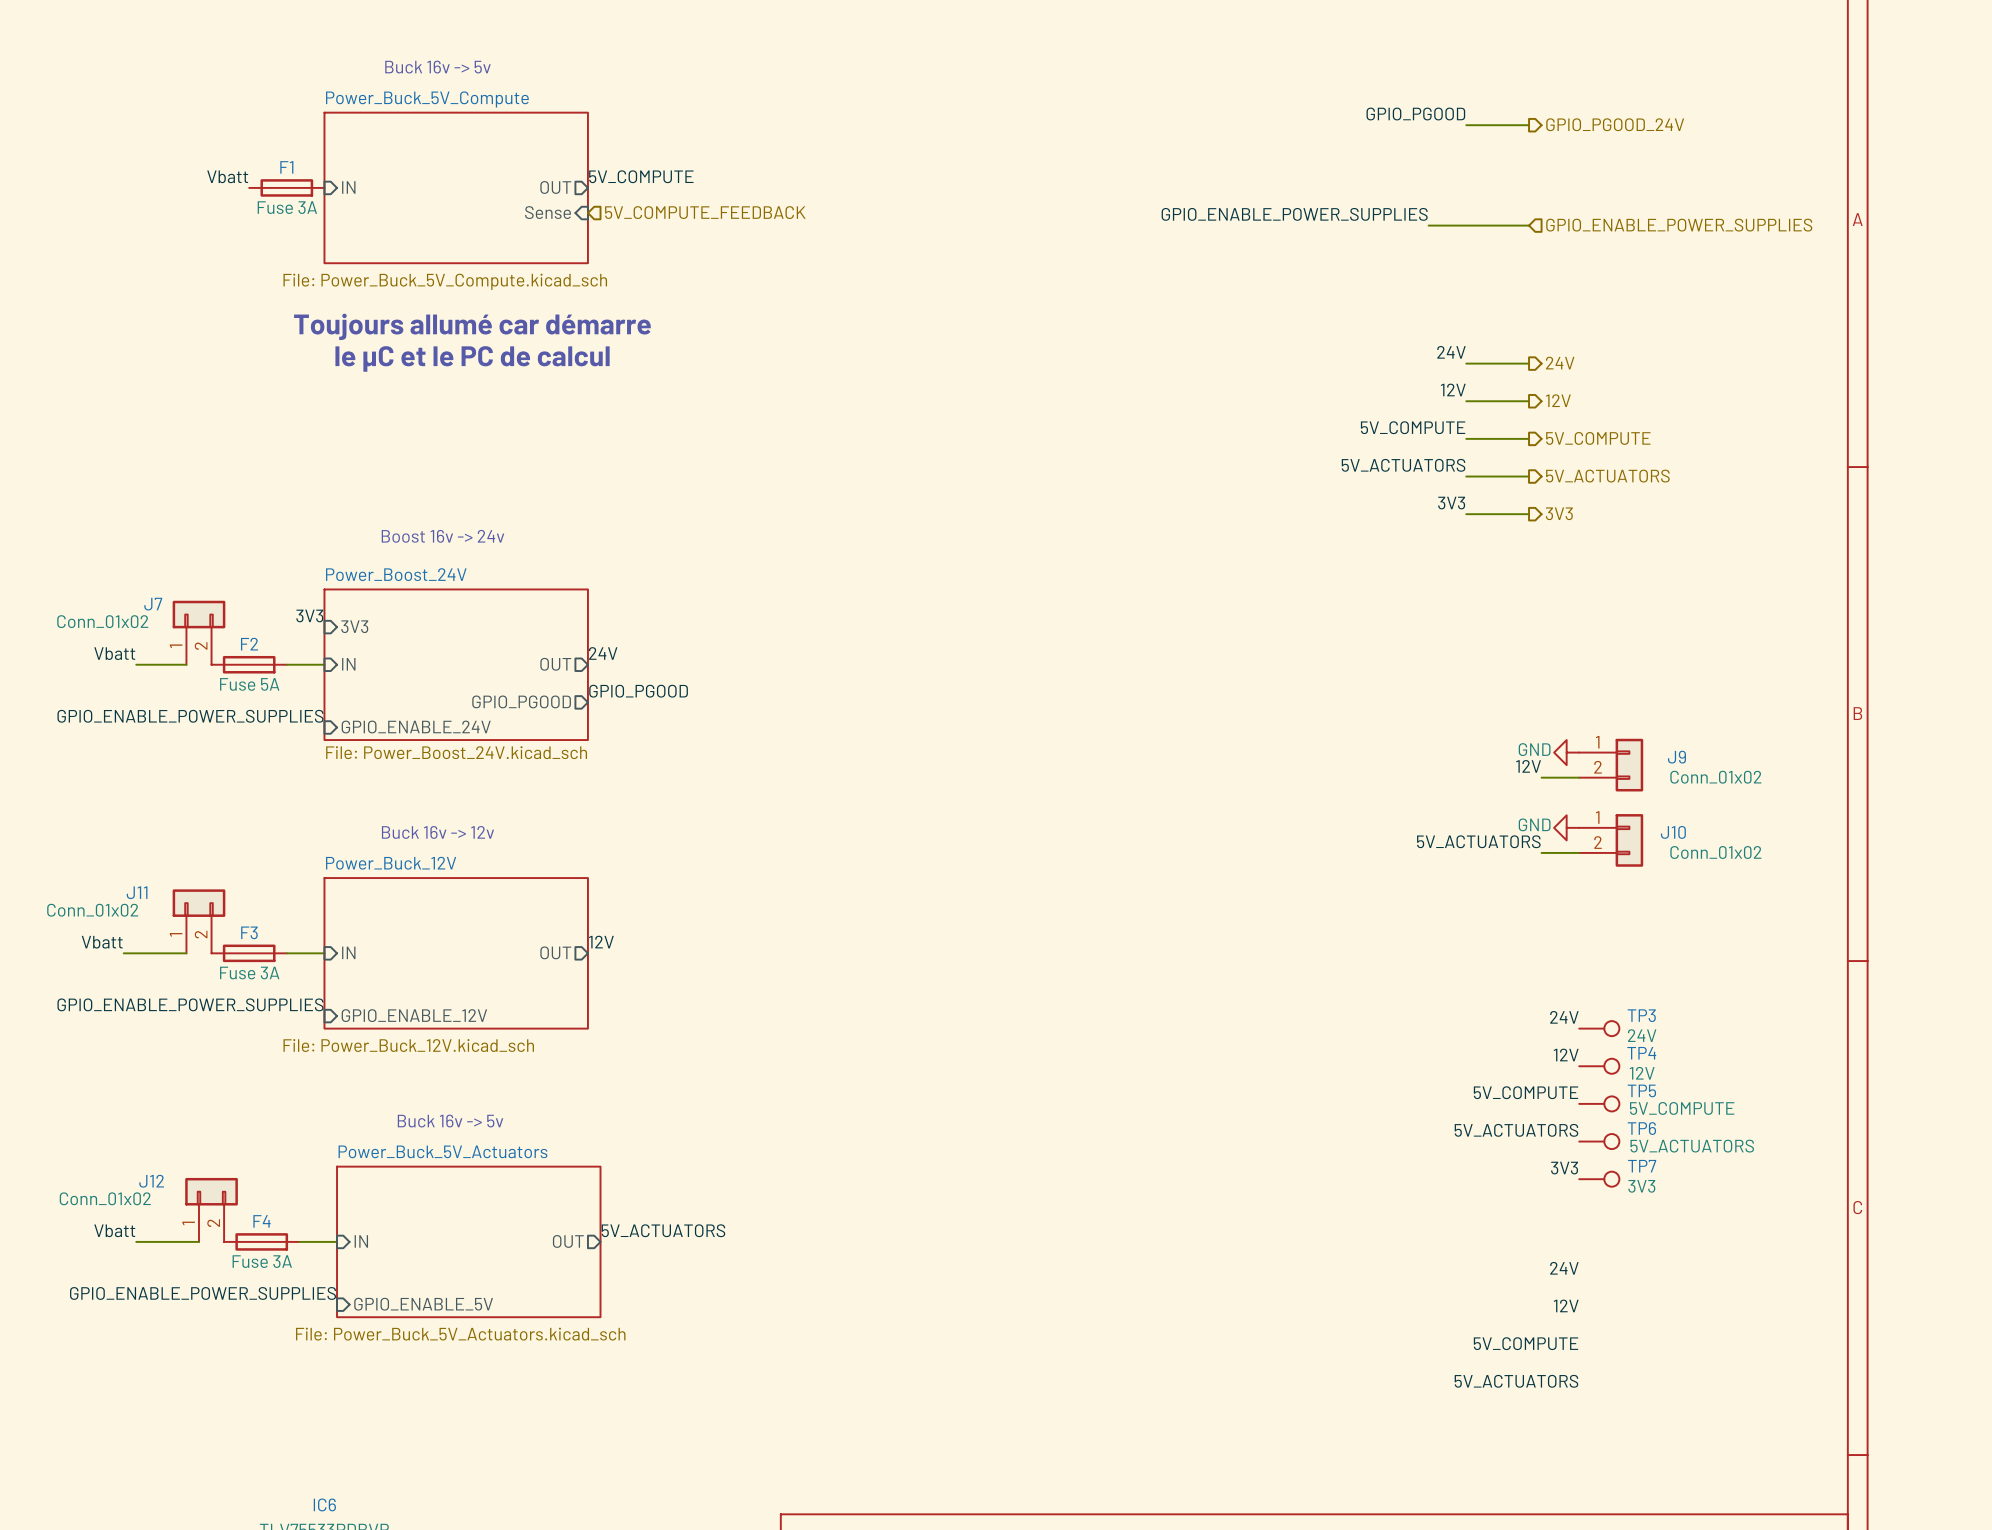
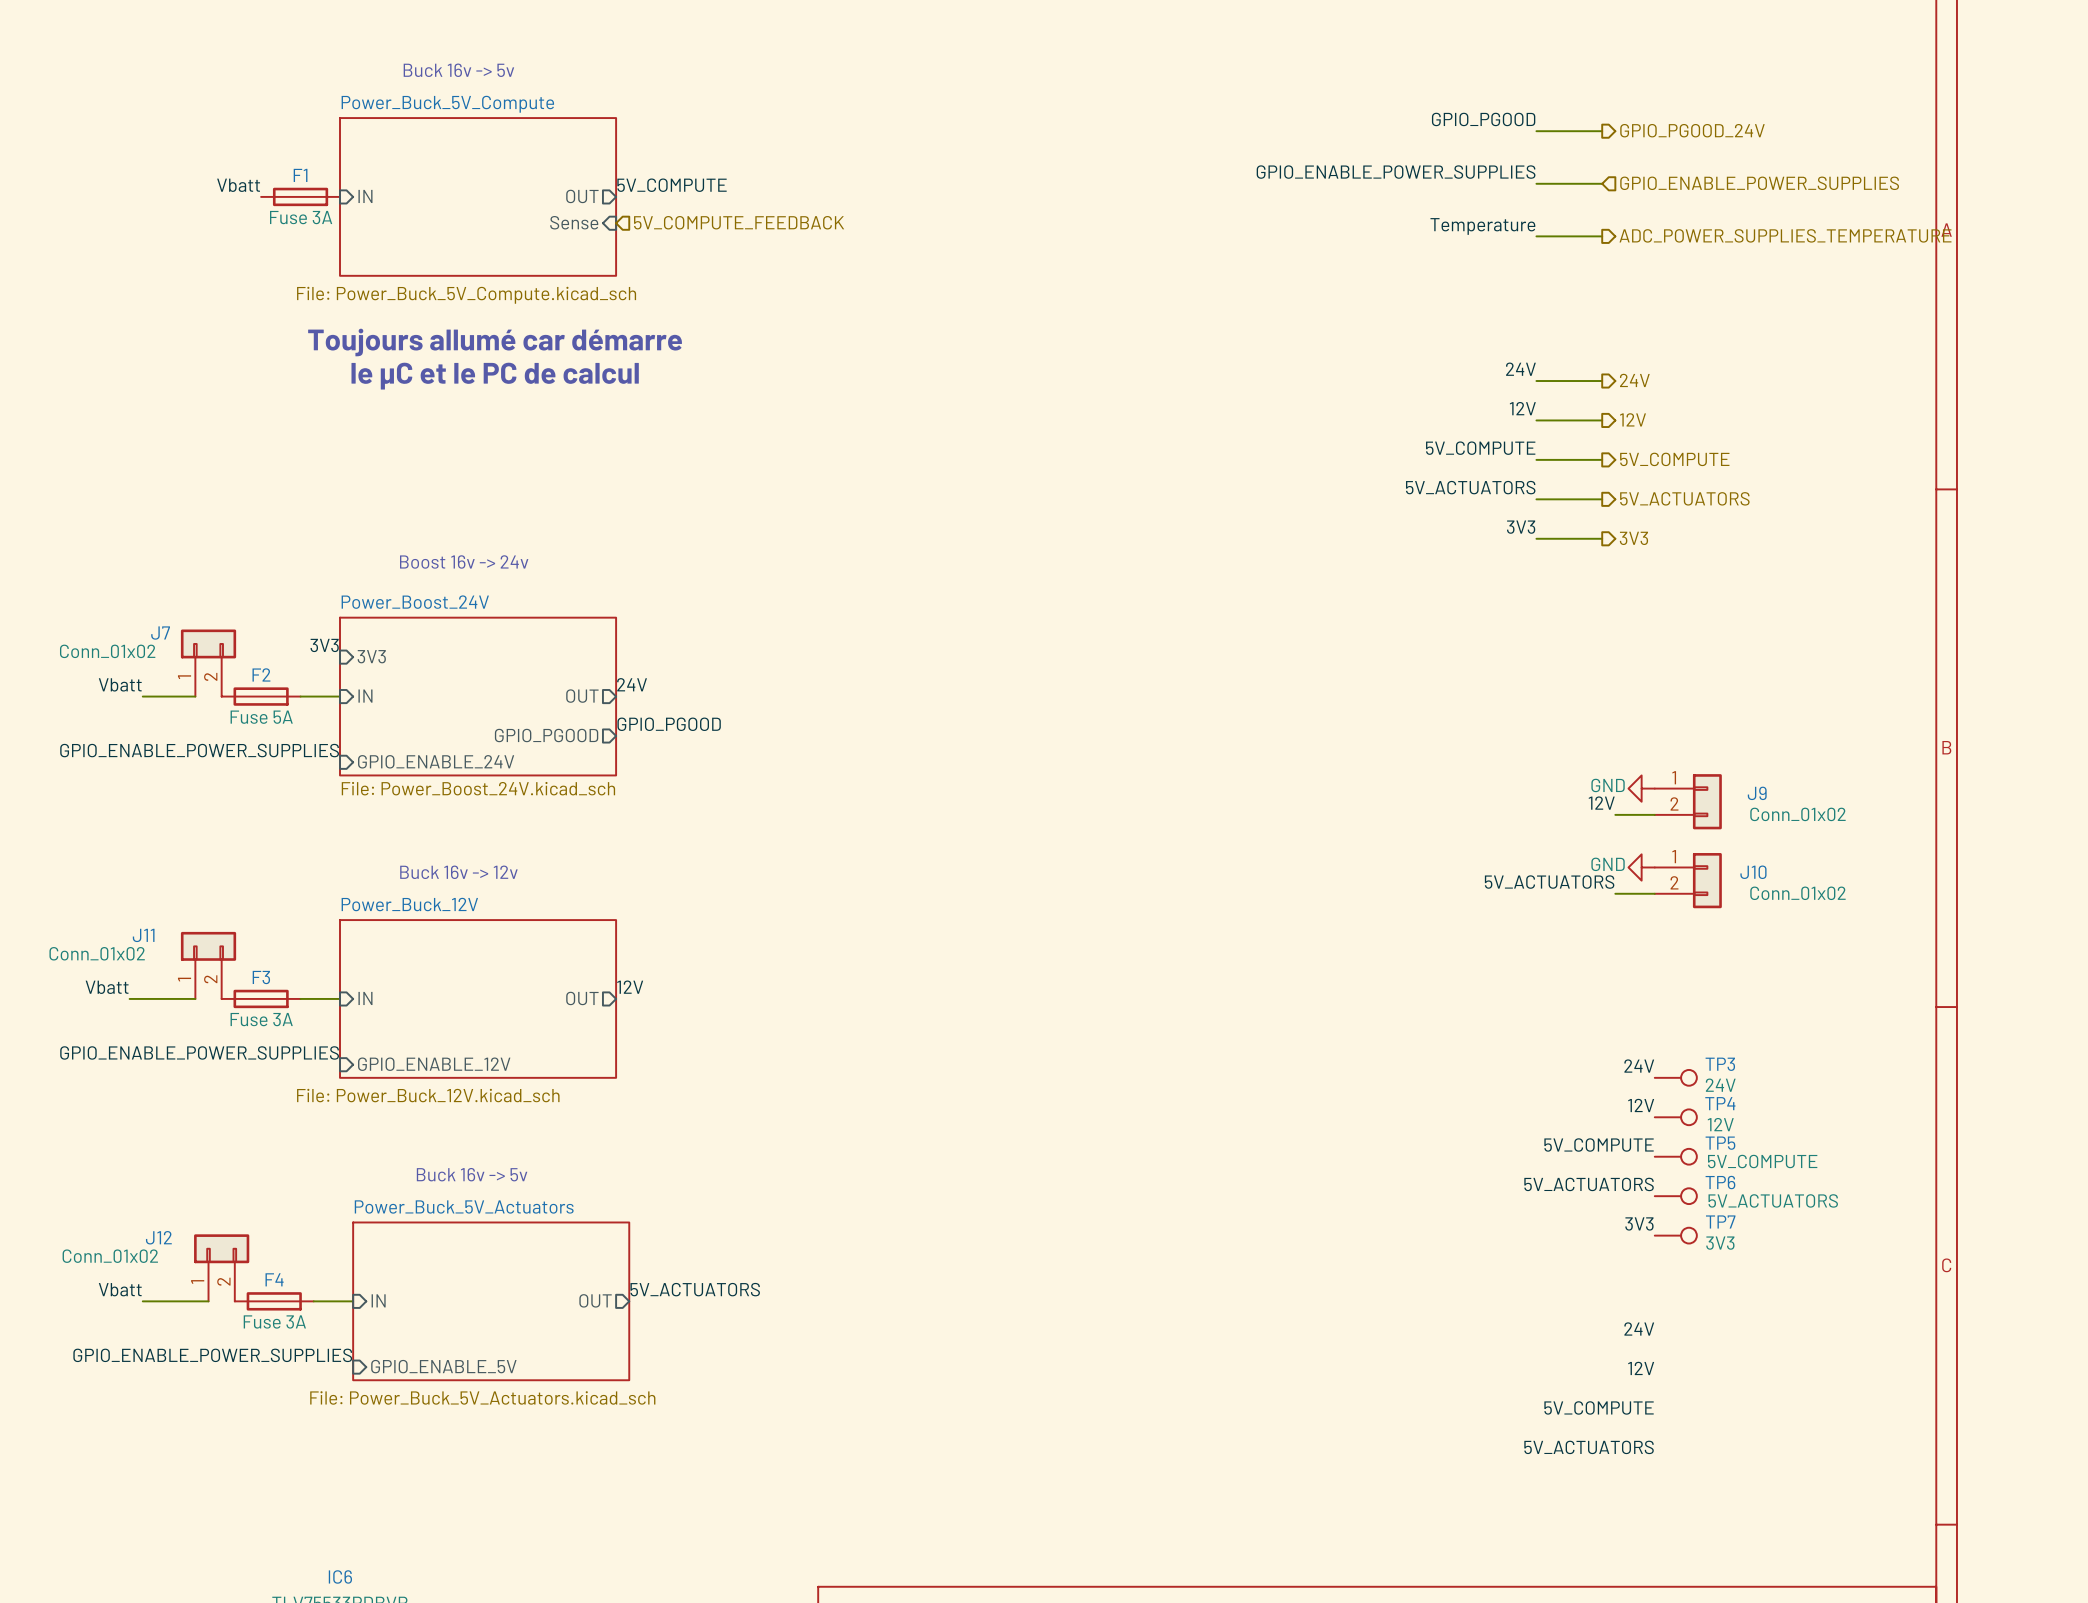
hierarchical label: none -> GPIO_ENABLE_POWER_SUPPLIES (1759, 183)
wire: none -> (1536, 183) (1602, 183)
label position: GPIO_ENABLE_POWER_SUPPLIES (1294, 214) -> GPIO_ENABLE_POWER_SUPPLIES (1396, 172)
label: none -> Temperature (1482, 226)
wire: (1428, 225) (1466, 225) -> none
hierarchical label shape: input (1679, 225) -> output (1785, 235)
hierarchical label: GPIO_ENABLE_POWER_SUPPLIES (1679, 225) -> ADC_POWER_SUPPLIES_TEMPERATURE (1785, 235)

